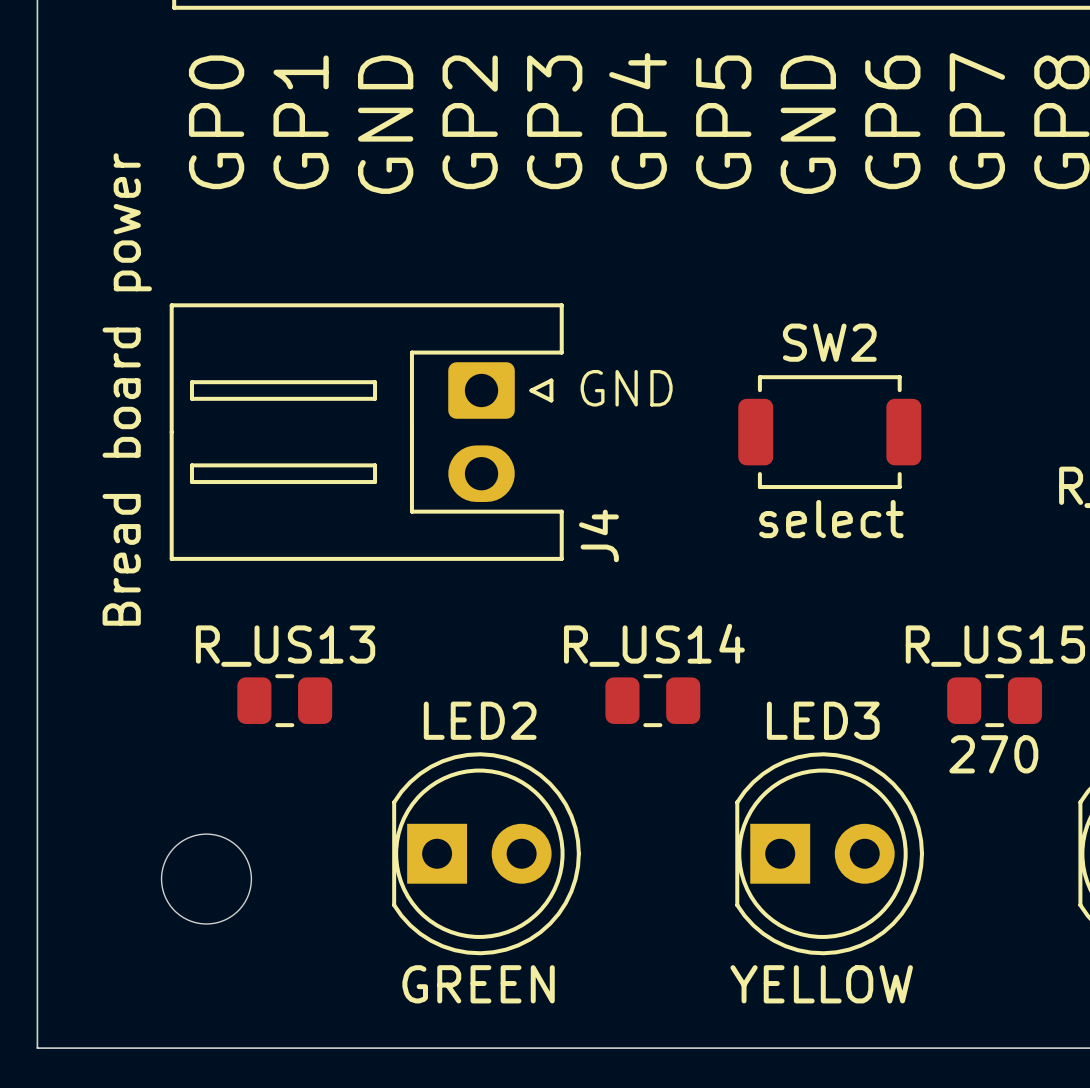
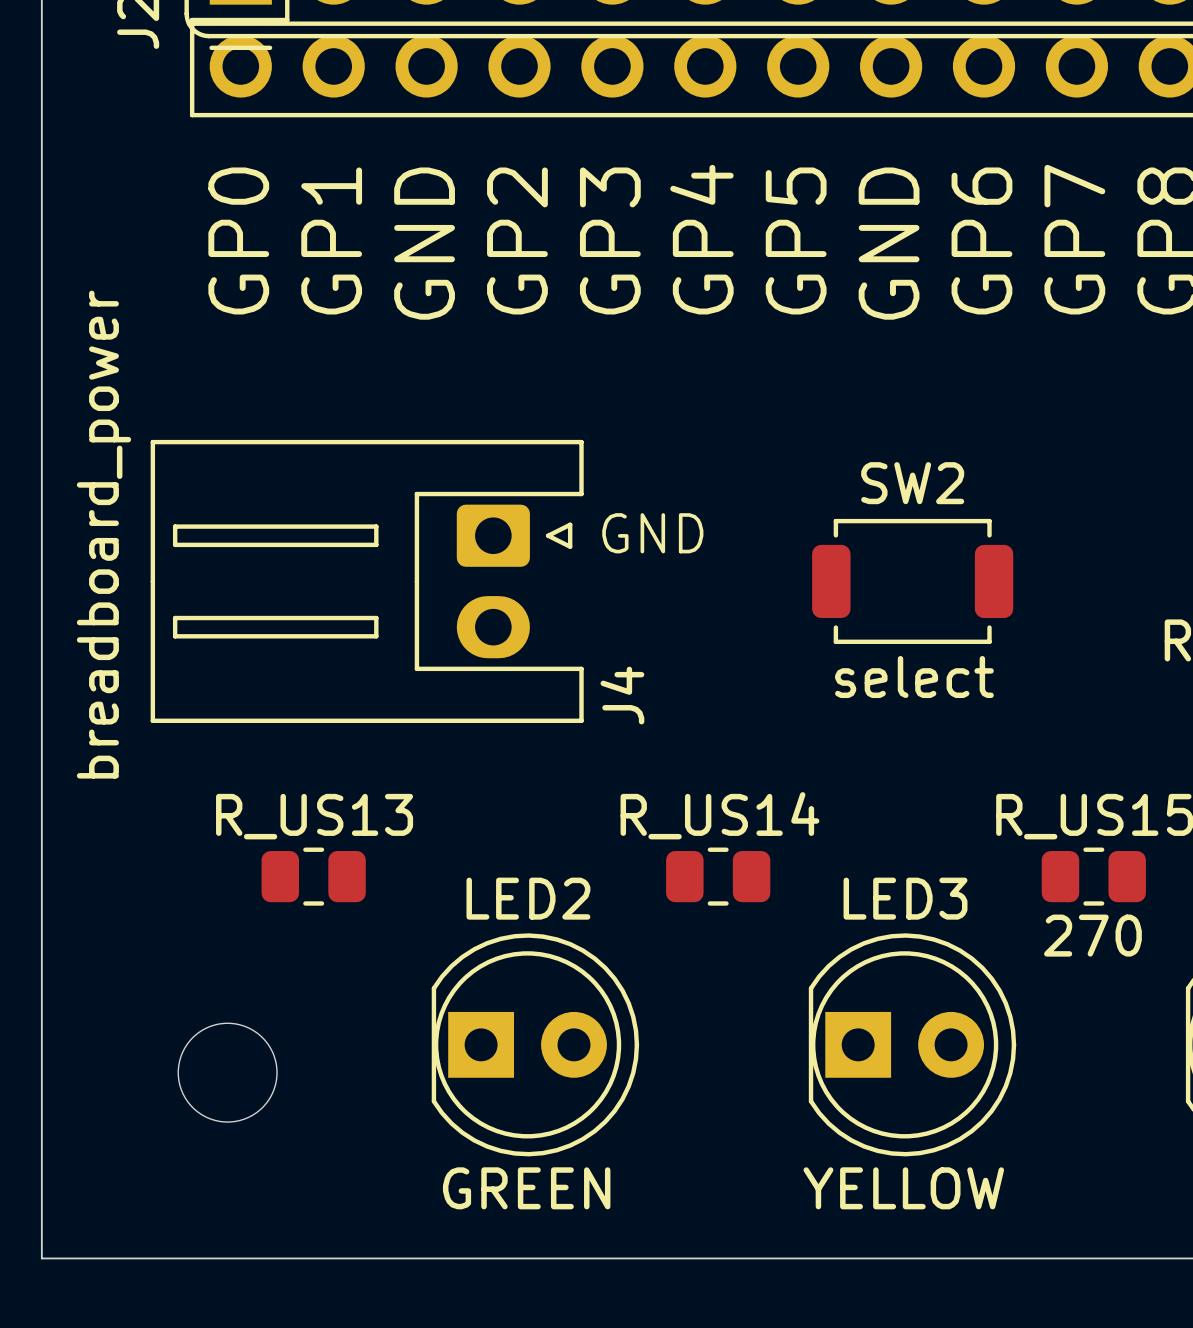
J4 value: Bread board power (127, 389) -> breadboard_power (103, 534)
J4 position: (366, 432) -> (367, 581)

